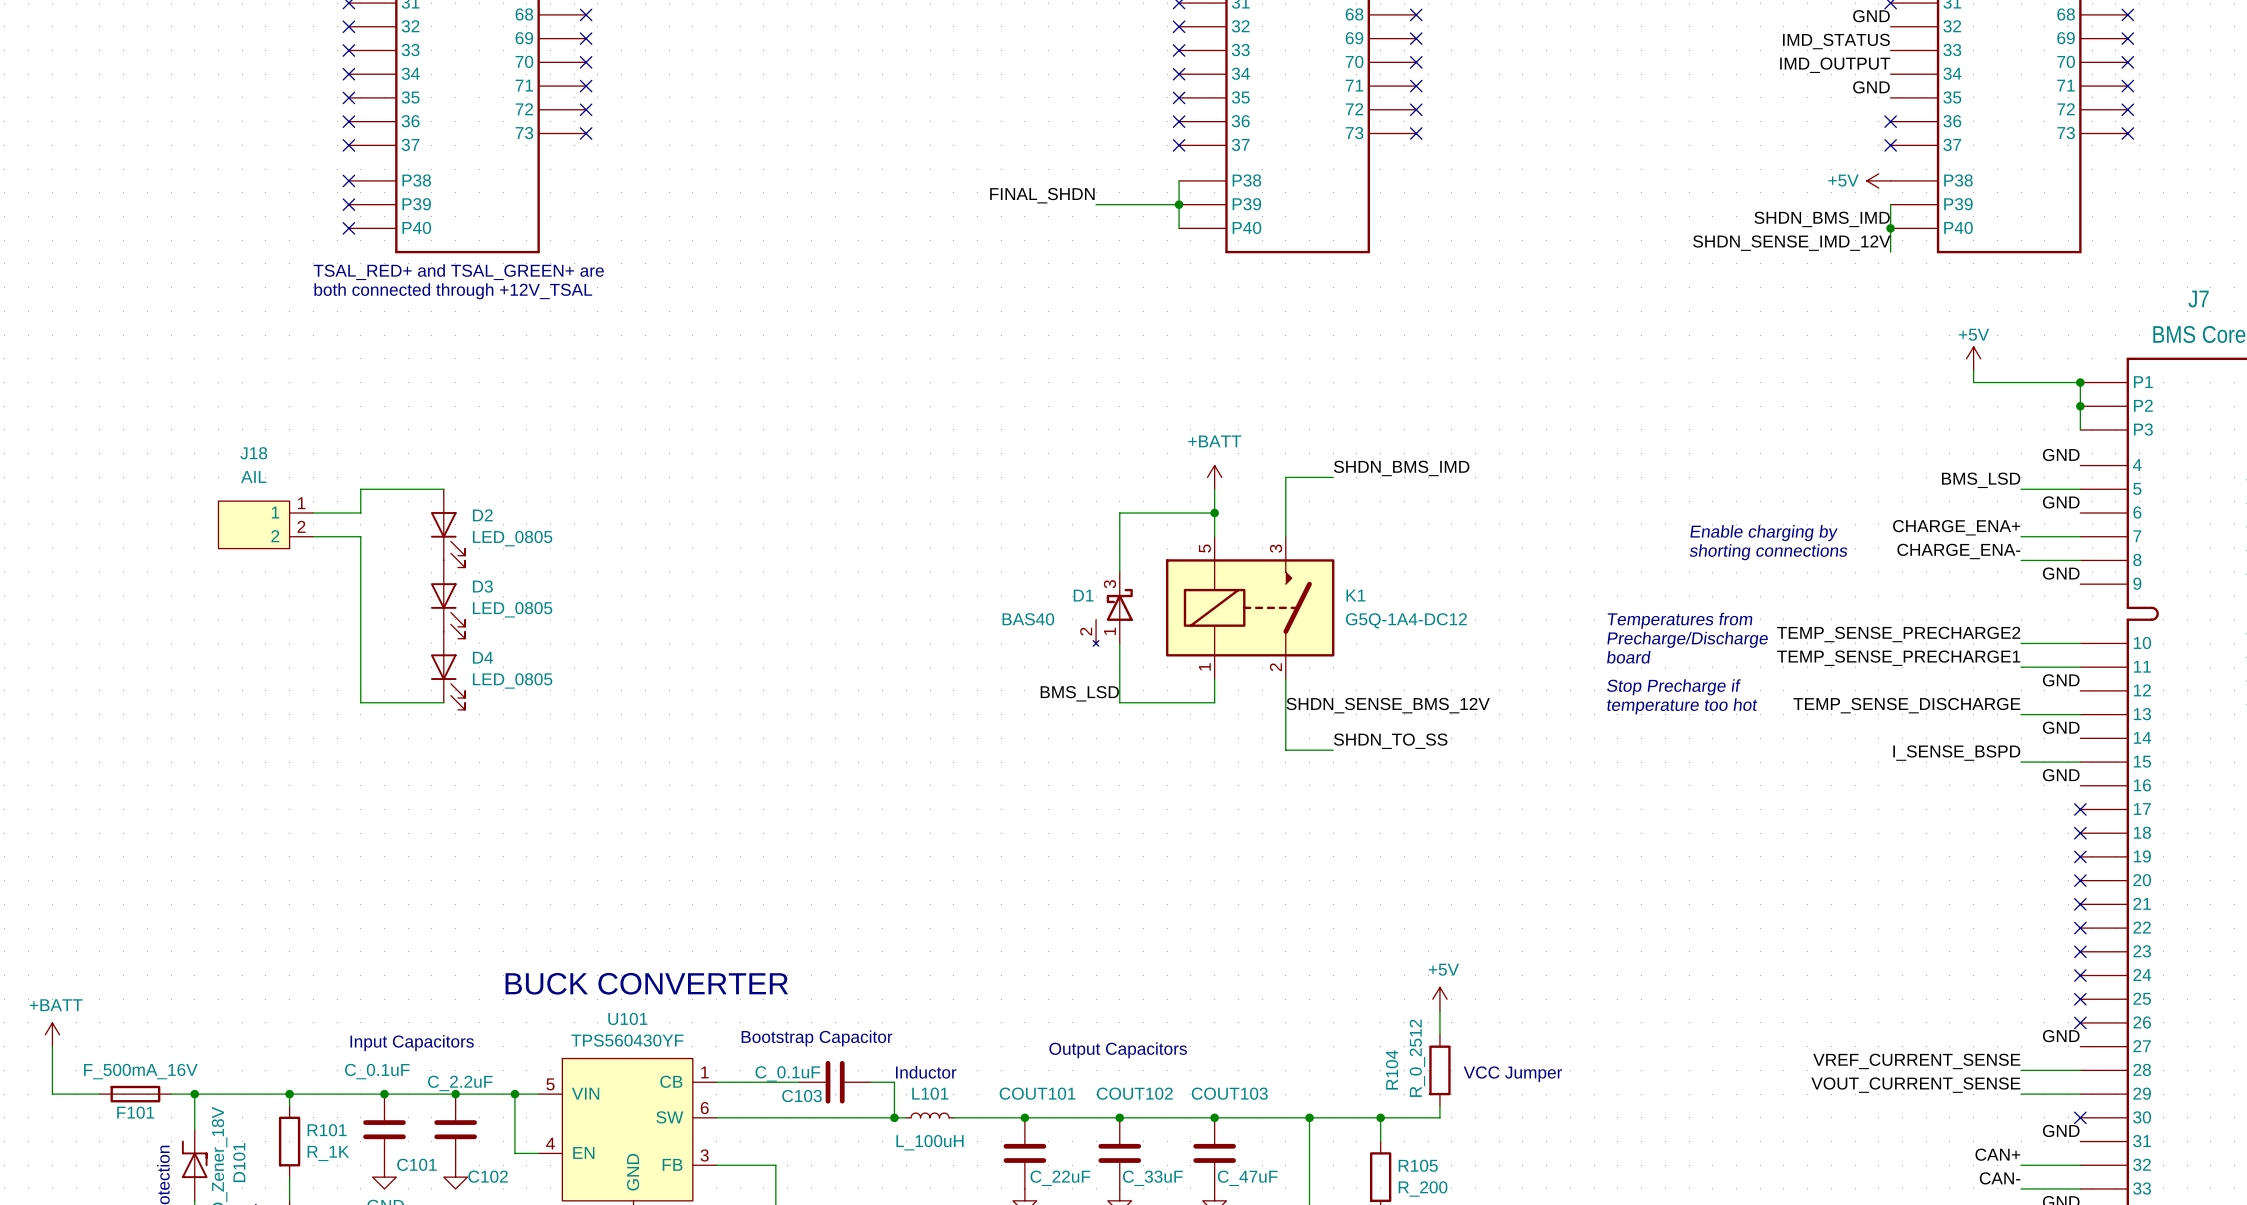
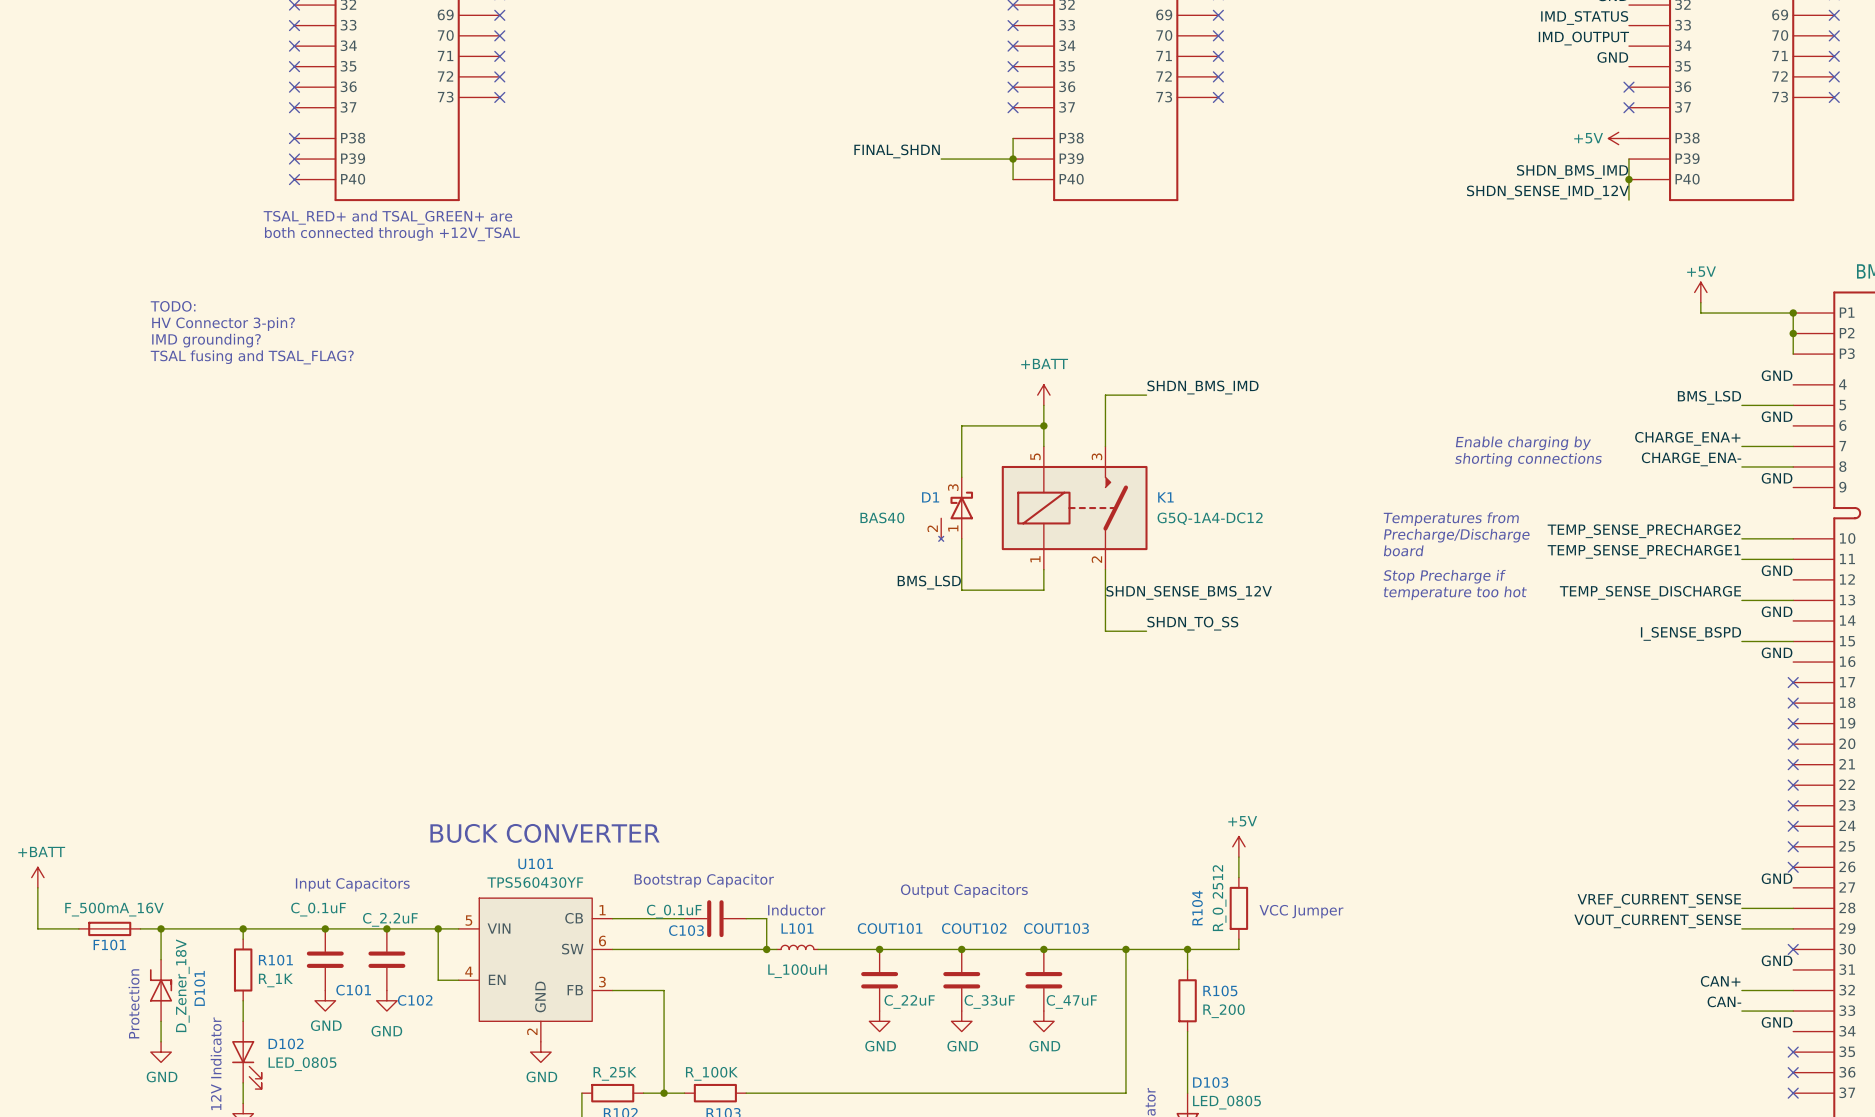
text: none -> TODO: (173, 306)
text: none -> HV Connector 3-pin? (223, 324)
text: none -> IMD grounding? (206, 340)
text: none -> TSAL fusing and TSAL_FLAG? (252, 357)
wire: (443, 489) (360, 489) (360, 513) (313, 513) -> none
J18: AIL (265, 524) -> none
D2: LED_0805 (448, 528) -> none
wire: (313, 536) (360, 536) (360, 702) (443, 702) -> none
D3: LED_0805 (448, 599) -> none
D4: LED_0805 (448, 670) -> none

